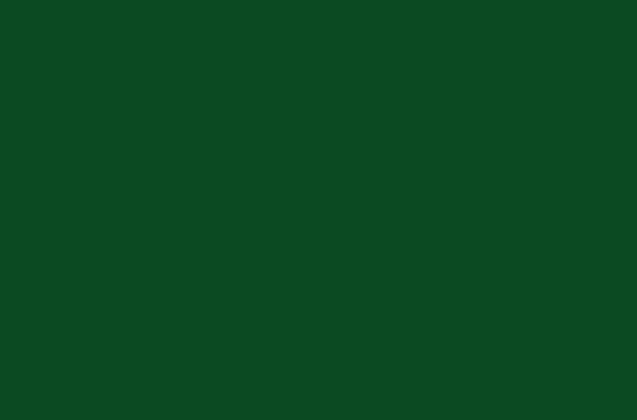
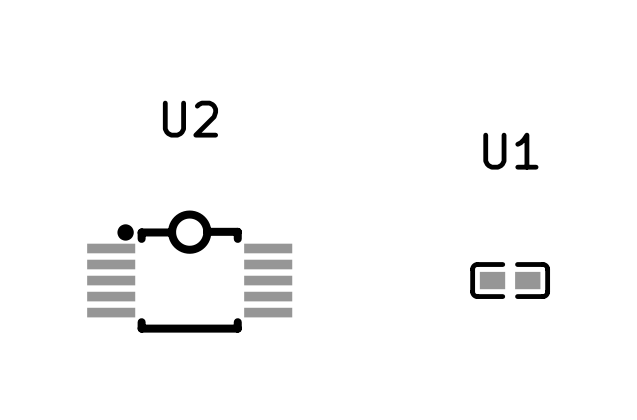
U2: none -> (189, 271)
U1: none -> (510, 280)

